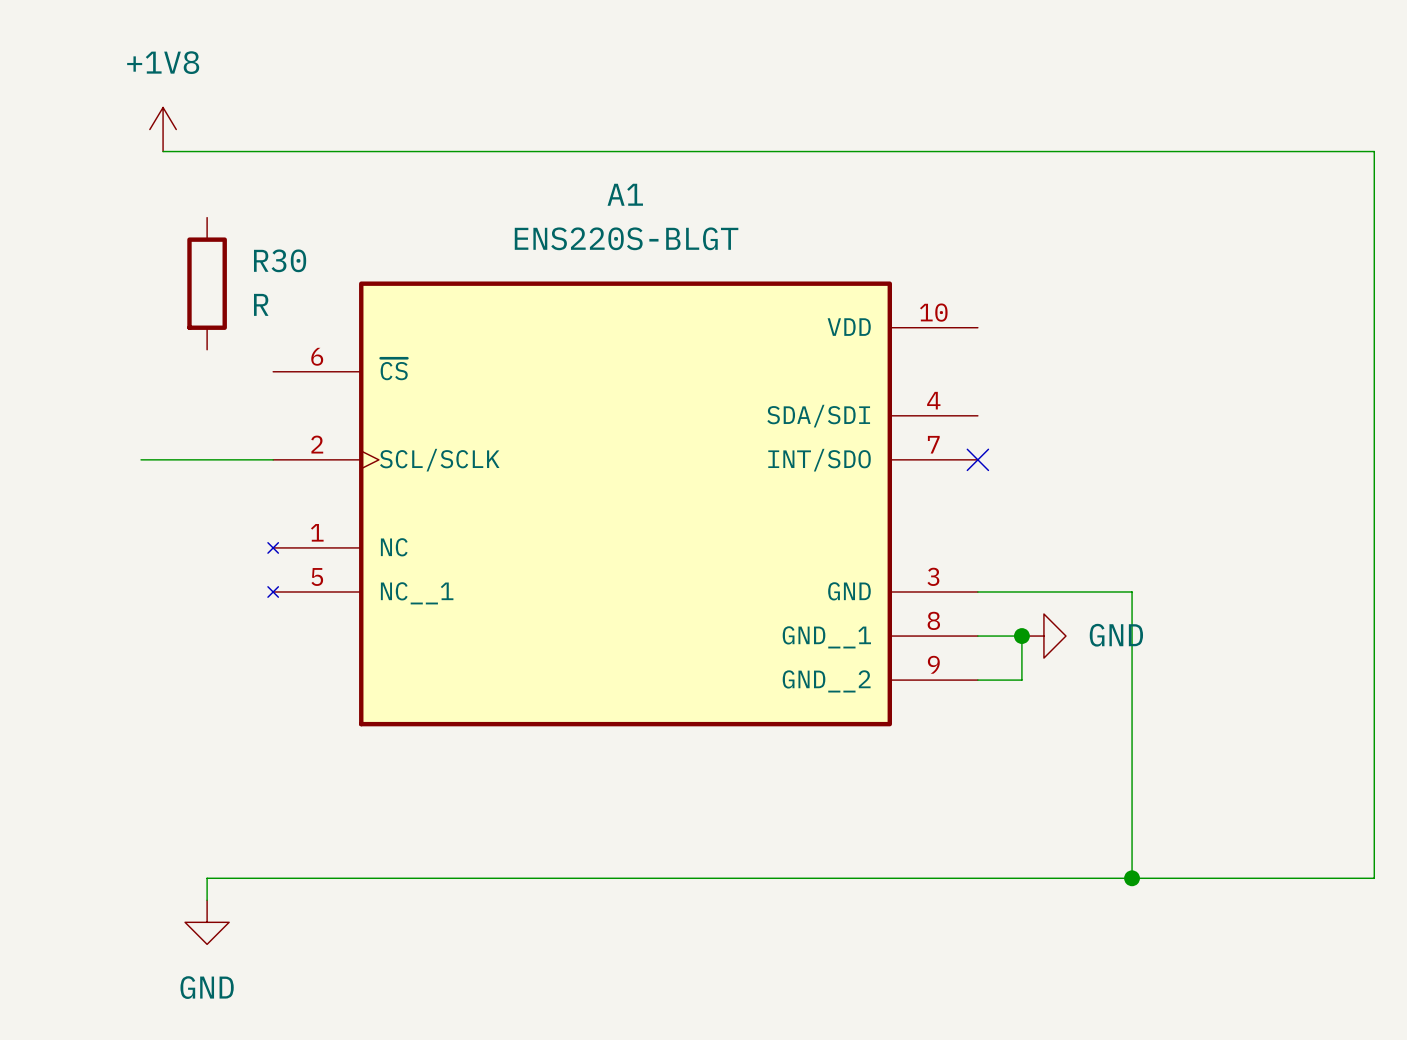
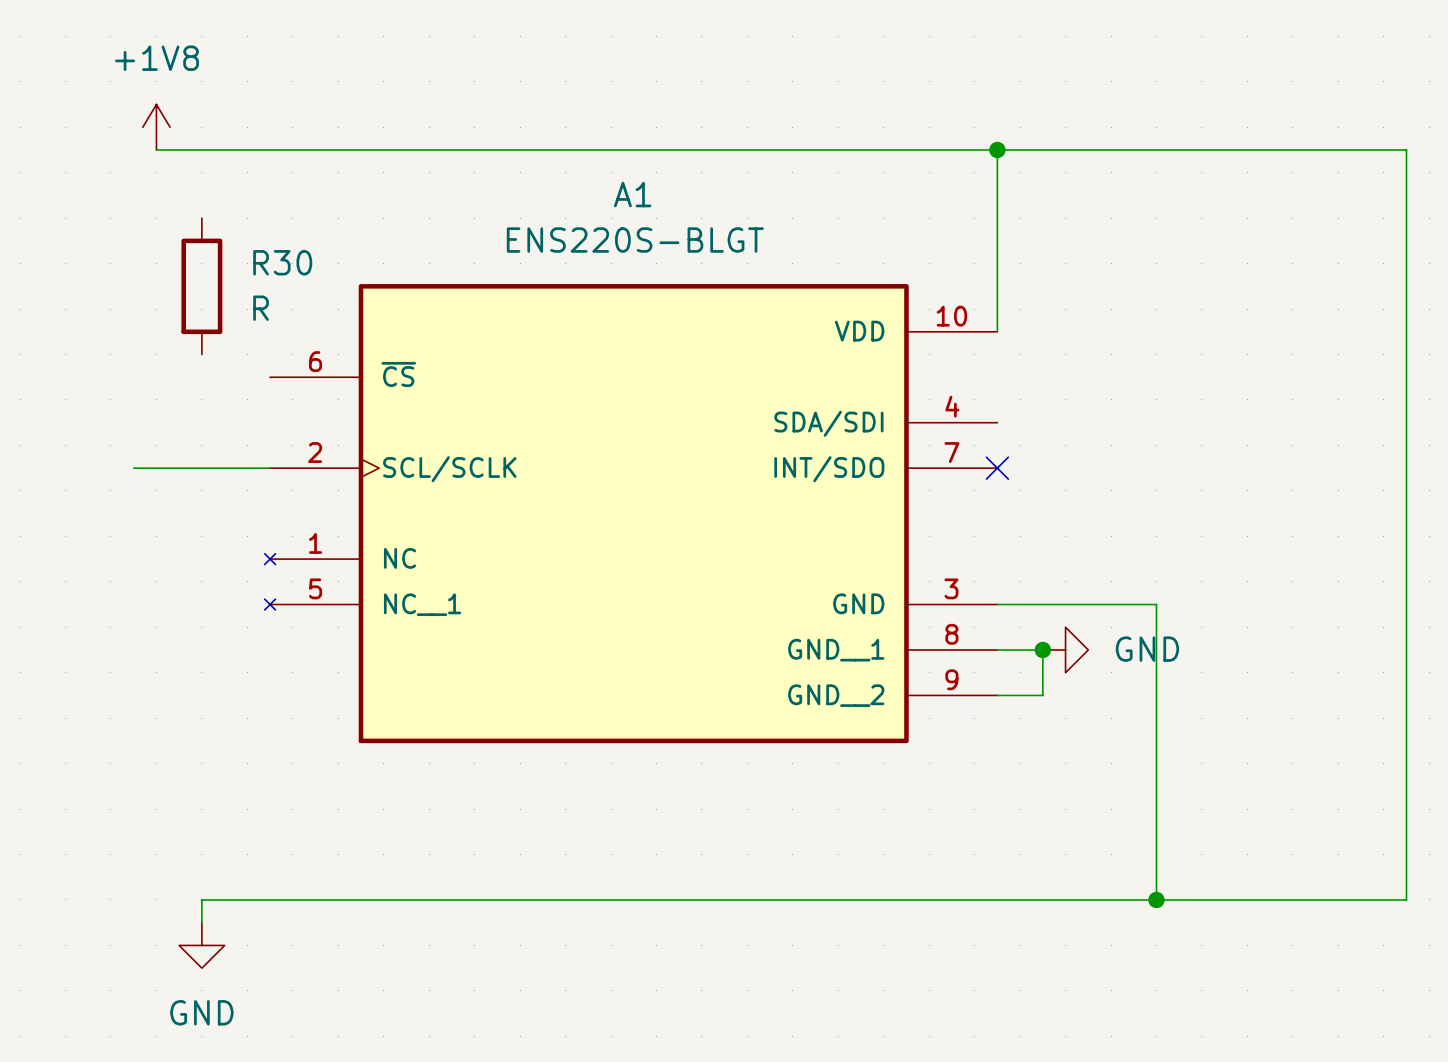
wire: none -> (997, 149) (997, 331)
junction: none -> (997, 149)

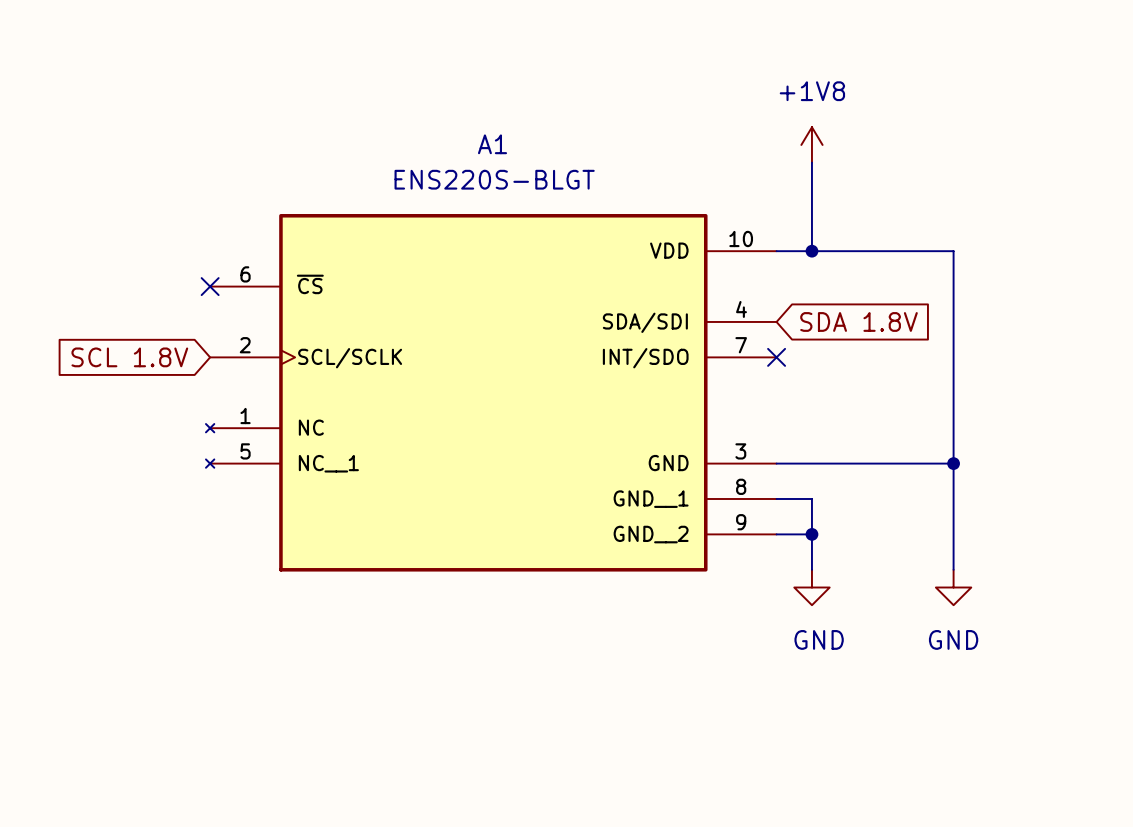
power symbol: +1V8 (156, 127) -> none
wire: (156, 149) (1406, 149) (1406, 899) (201, 899) (201, 922) -> none
wire: (997, 149) (997, 331) -> (953, 569) (953, 251) (776, 251)
junction: (997, 149) -> none
power symbol: none -> +1V8 (811, 144)
wire: none -> (811, 162) (811, 251)
R30: R (201, 286) -> none
junction: none -> (811, 251)
no-connect mark: none -> (210, 286)
global label: none -> SDA 1.8V (859, 321)
wire: (133, 468) (270, 468) -> none
global label: none -> SCL 1.8V (129, 357)
wire: (1156, 604) (1156, 899) -> (900, 463) (953, 463)
junction: none -> (953, 463)
junction position: (1042, 649) -> (811, 534)
power symbol: GND (1065, 649) -> none
wire: none -> (811, 534) (811, 569)
power symbol: none -> GND (811, 587)
power symbol: none -> GND (953, 587)
junction: (1156, 899) -> none
power symbol: GND (201, 945) -> none

